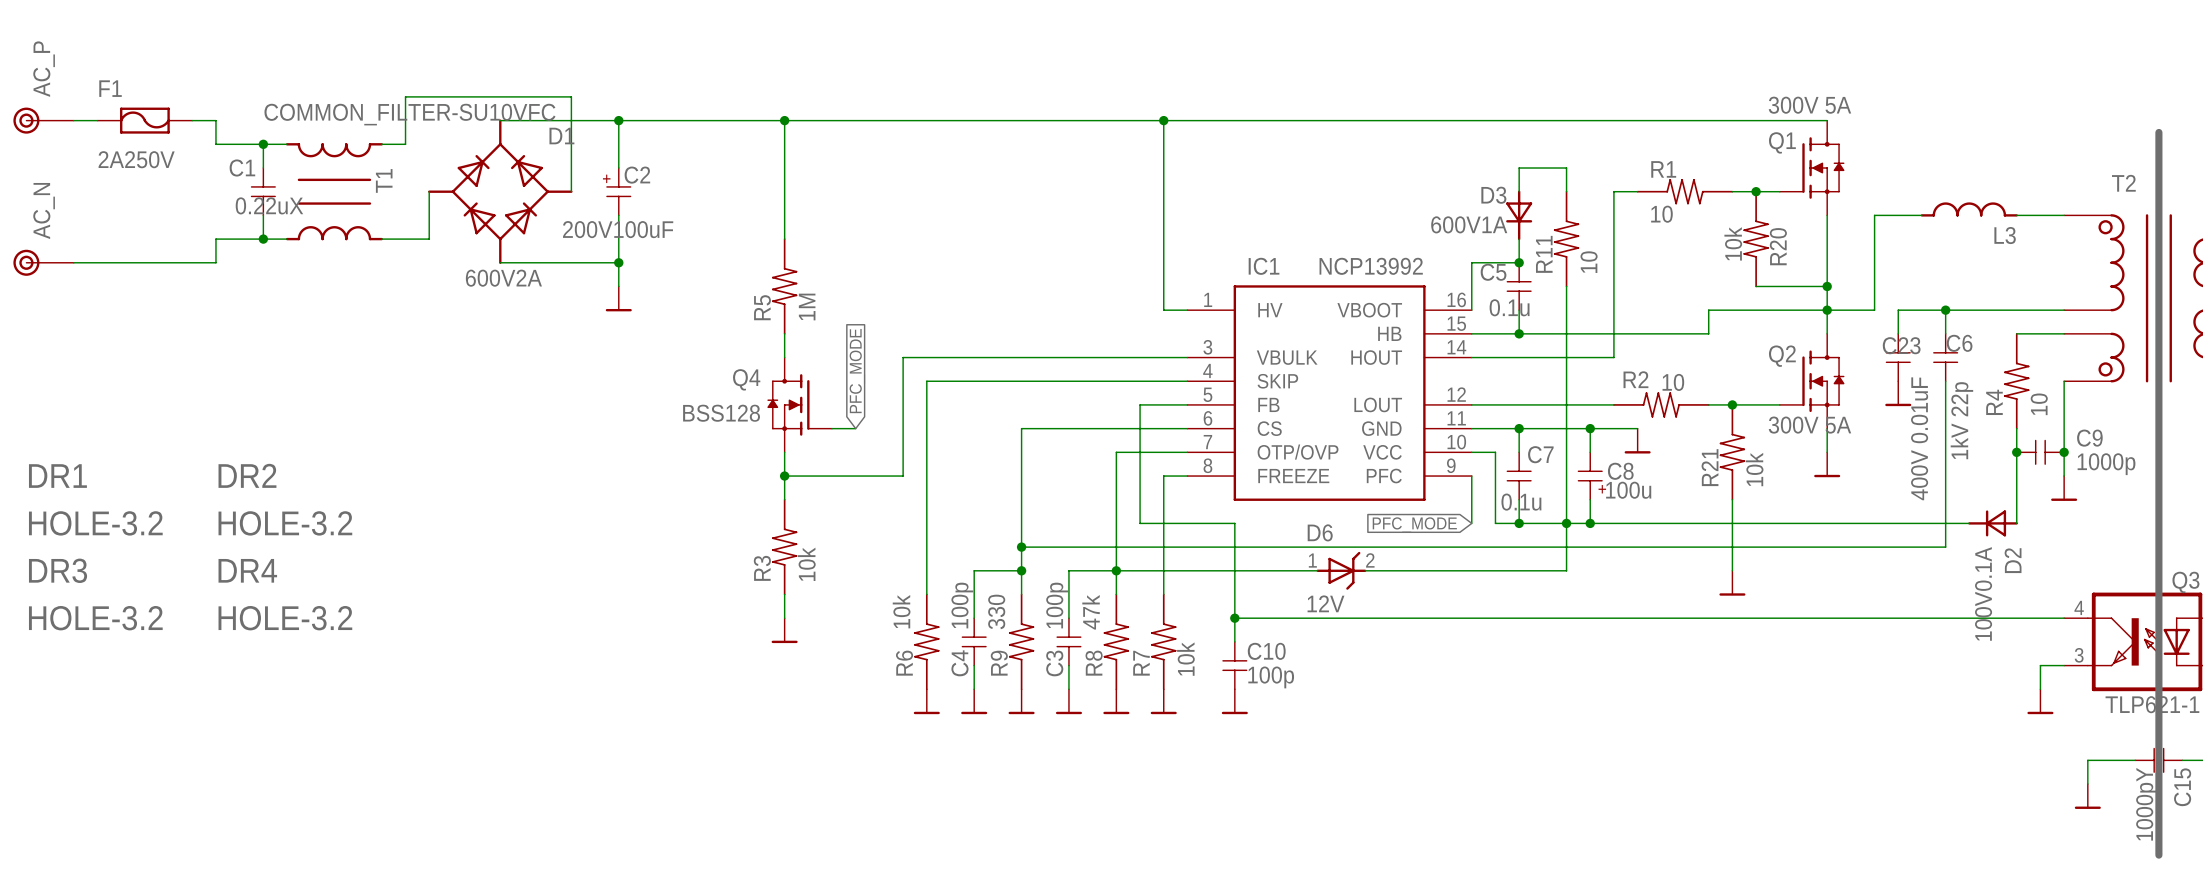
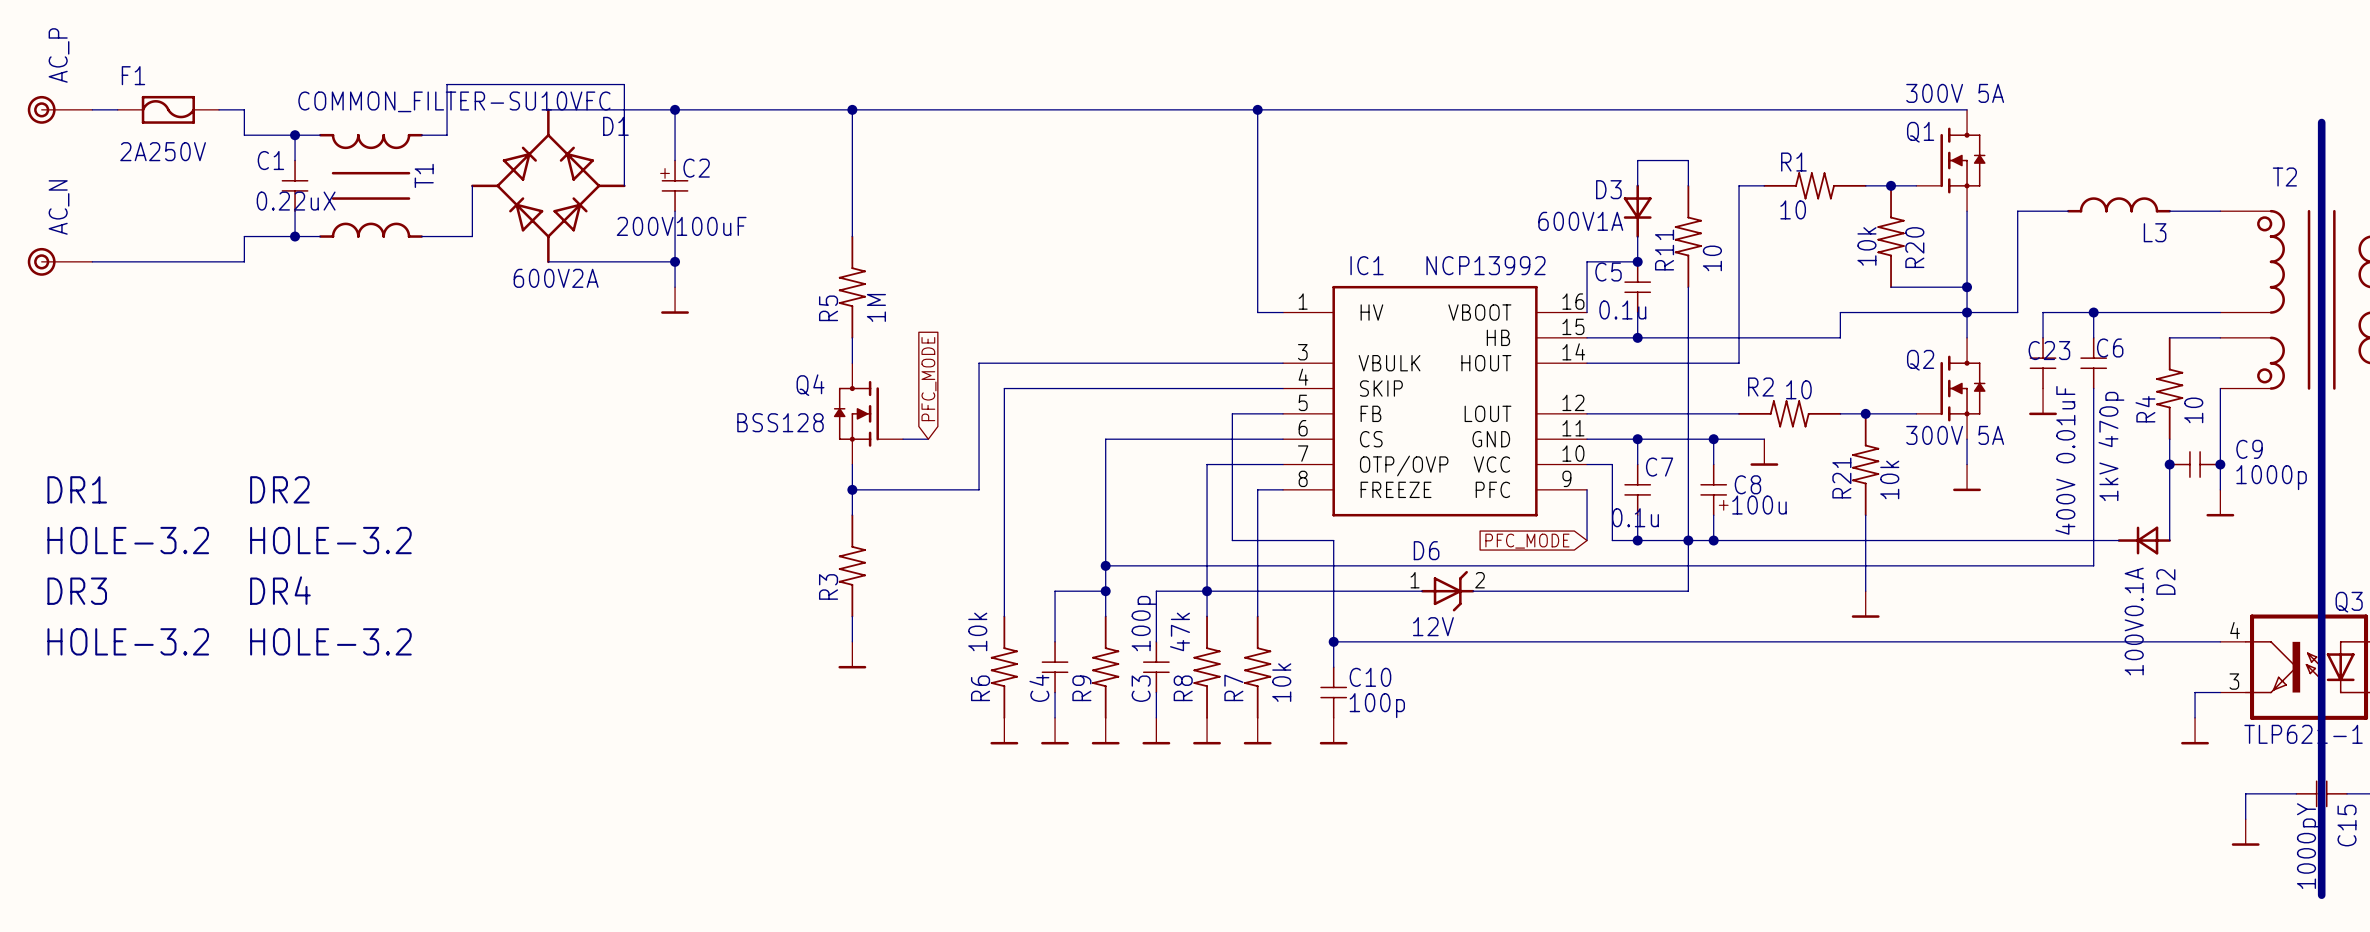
C6 value: 1kV 22p (1961, 420) -> 1kV 470p (2111, 446)
R3 value: 10k (806, 564) -> none
C4 value: 100p (962, 605) -> none
R9 value: 330 (996, 611) -> none

